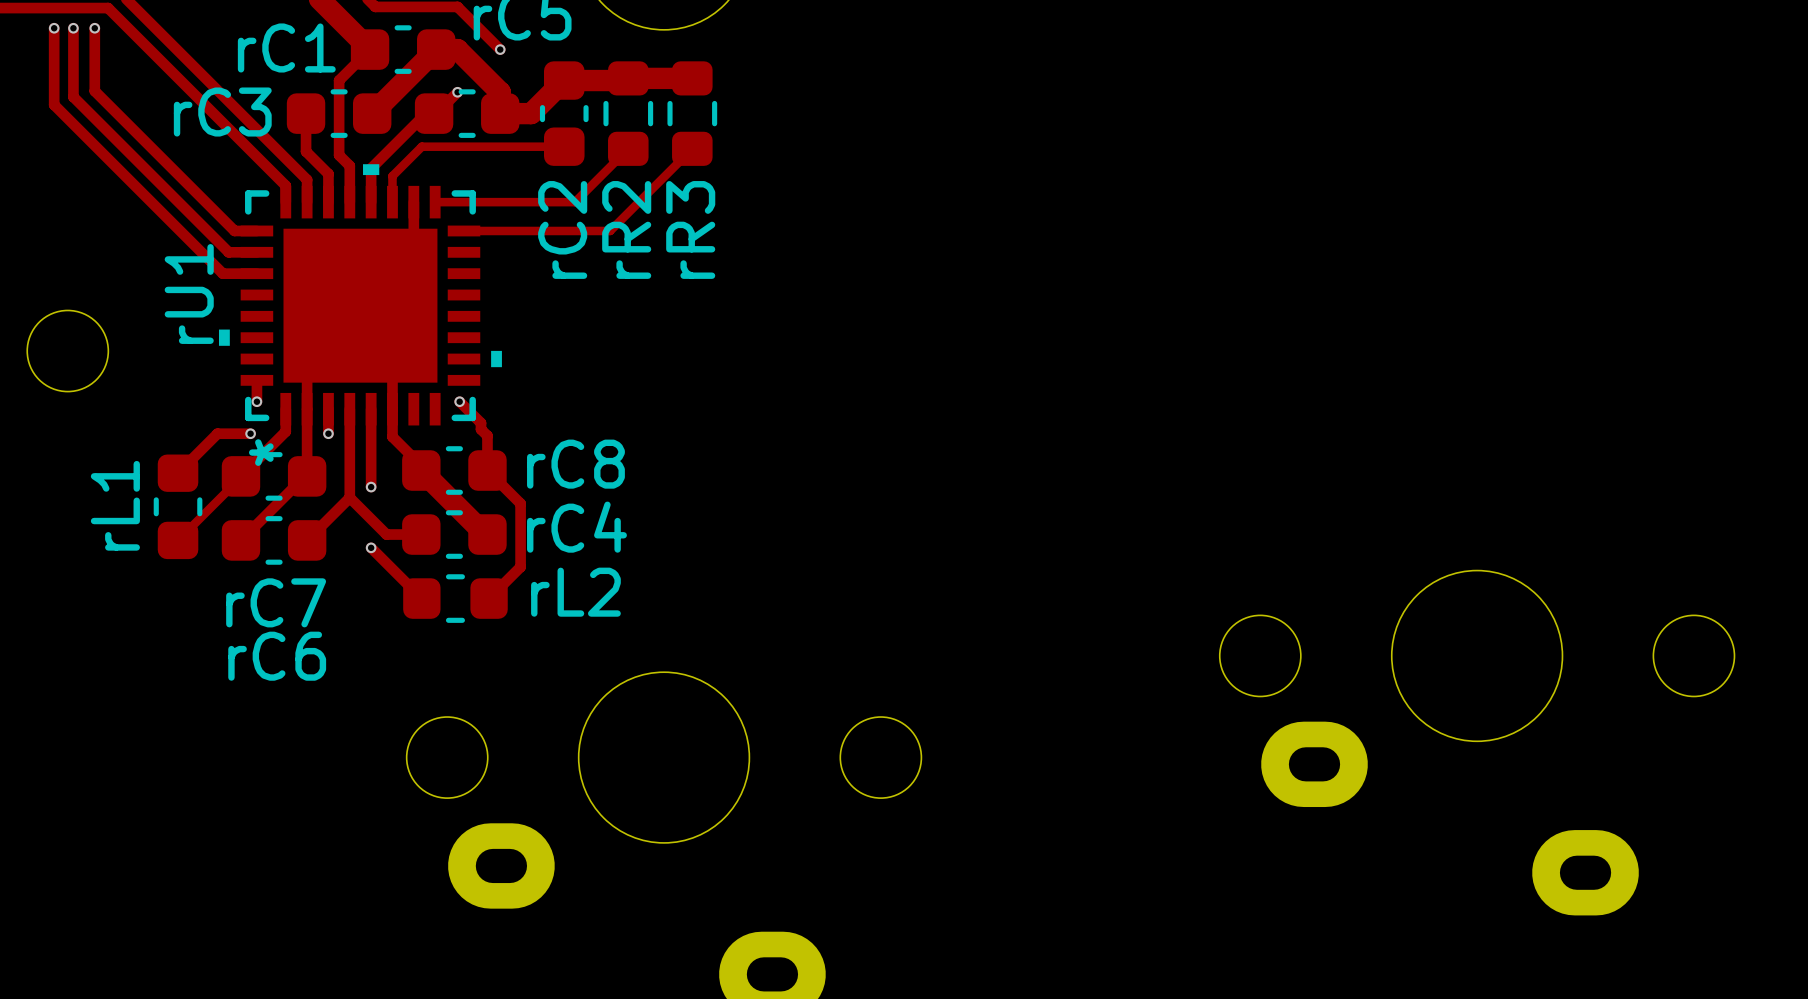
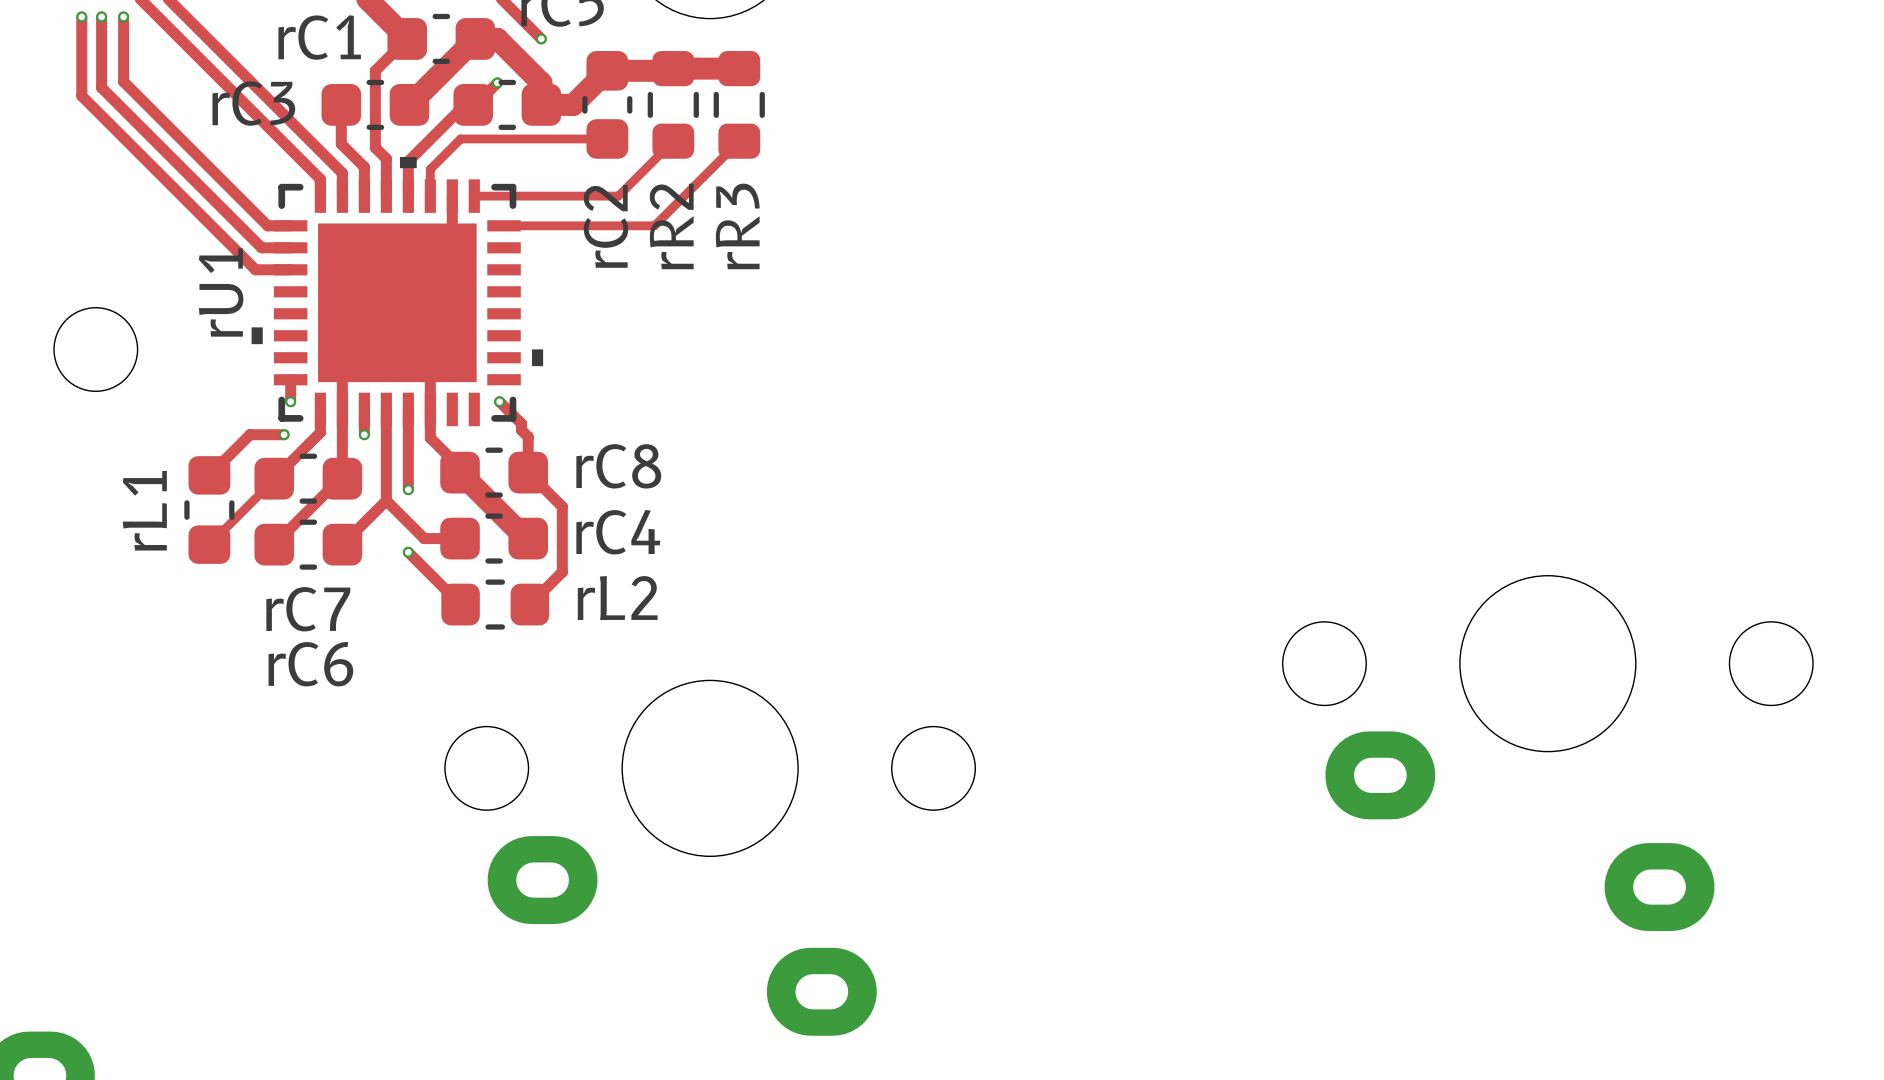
rU1 text: * (261, 452) -> none

